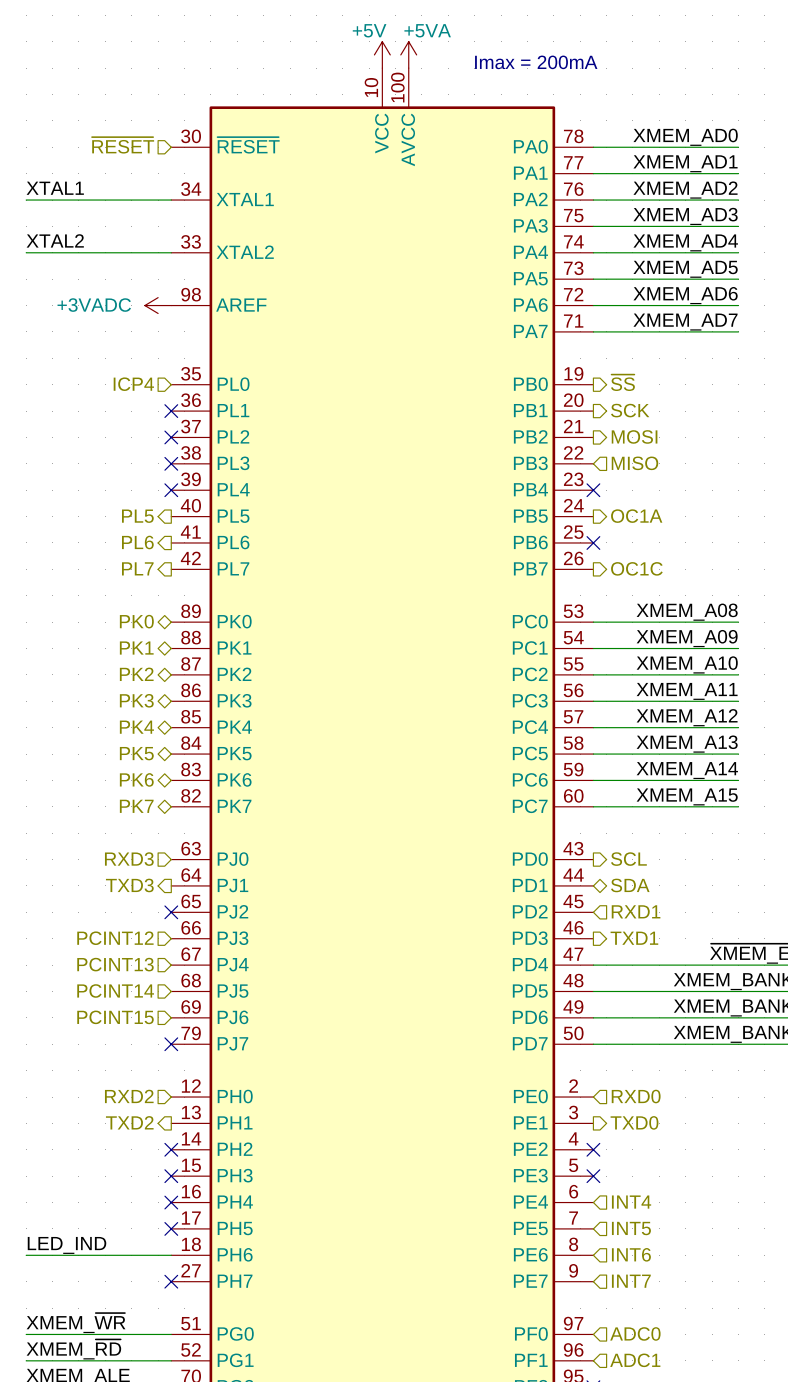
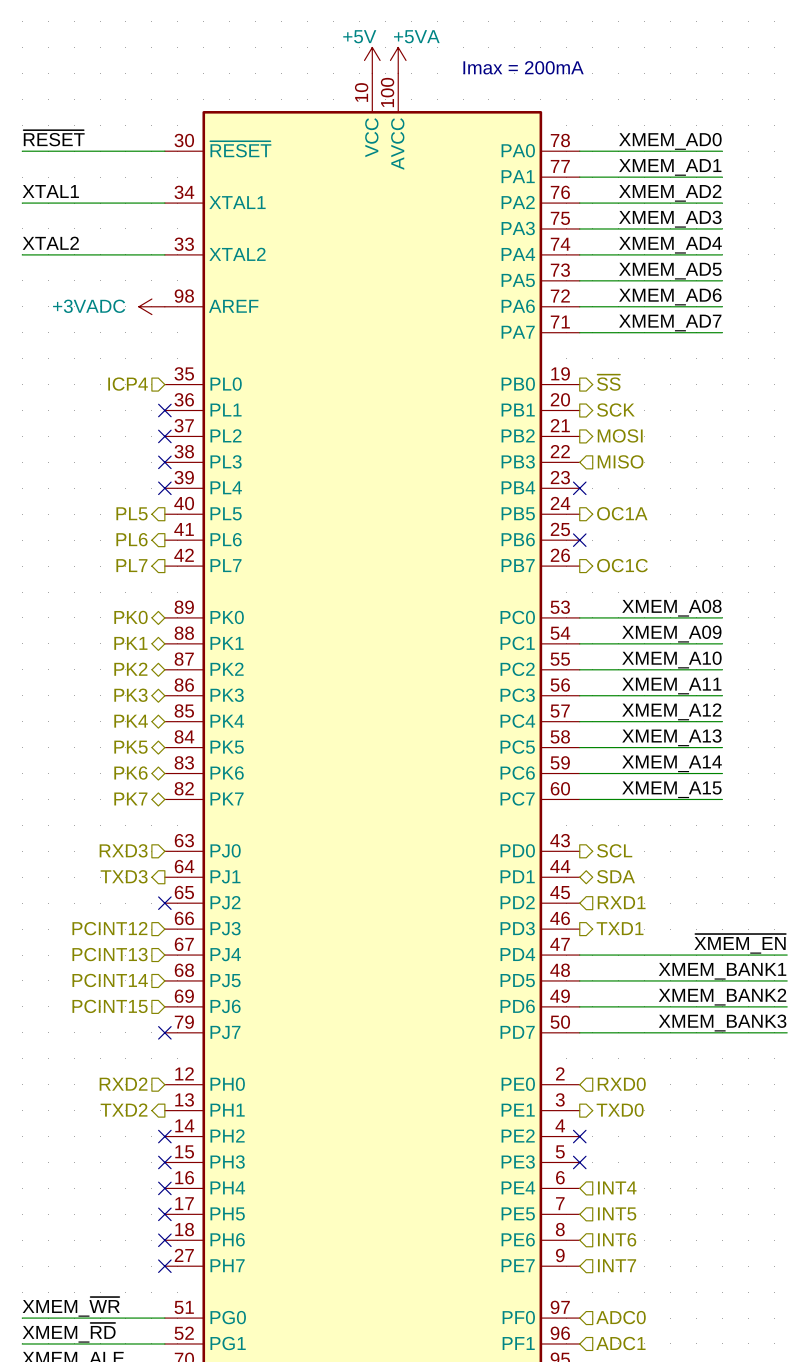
label: none -> ~{RESET} (54, 138)
hierarchical label: ~{RESET} (123, 145) -> none
wire: none -> (22, 151) (164, 151)
label: LED_IND (67, 1245) -> none
wire: (26, 1255) (171, 1255) -> none
no-connect mark: none -> (164, 1240)

